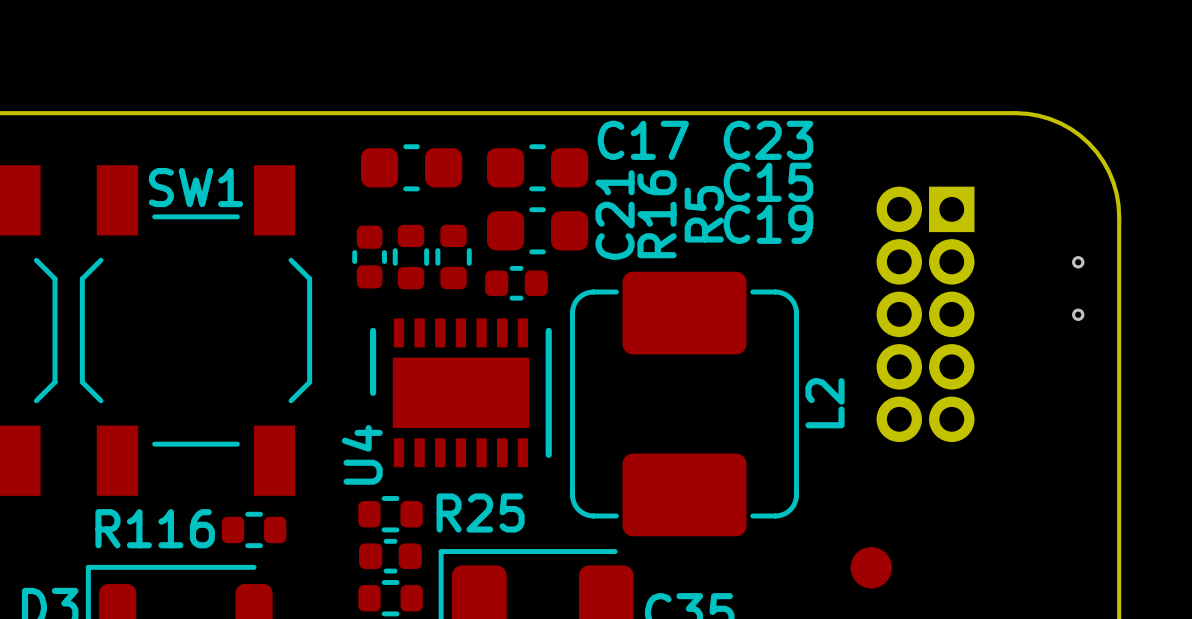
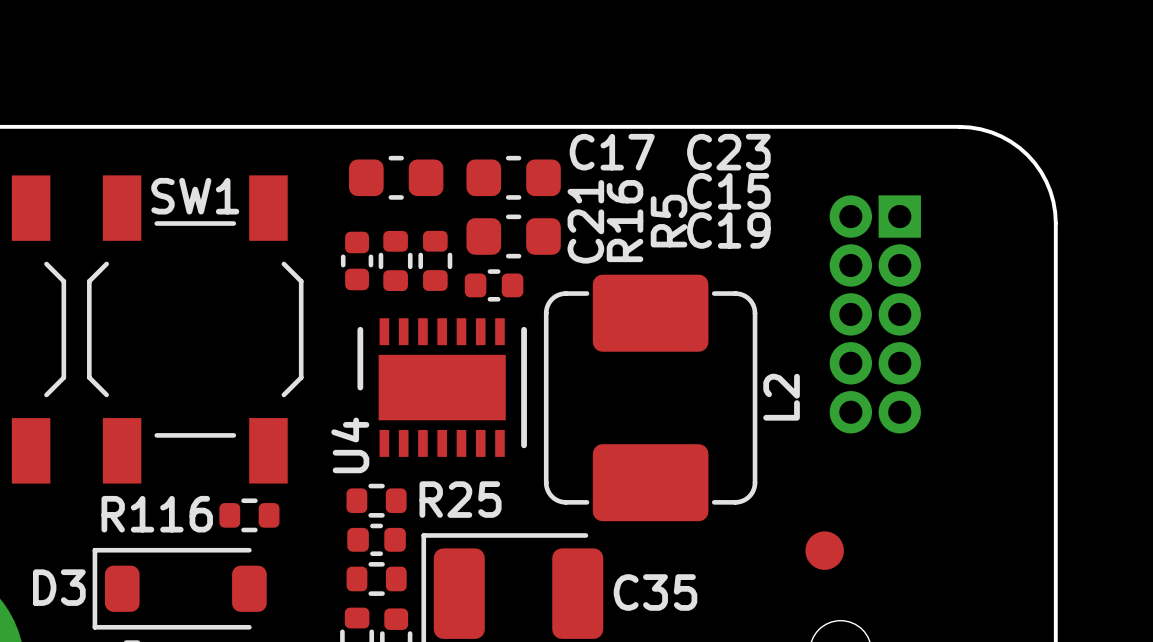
via: (1078, 262) -> none
via: (1078, 314) -> none

